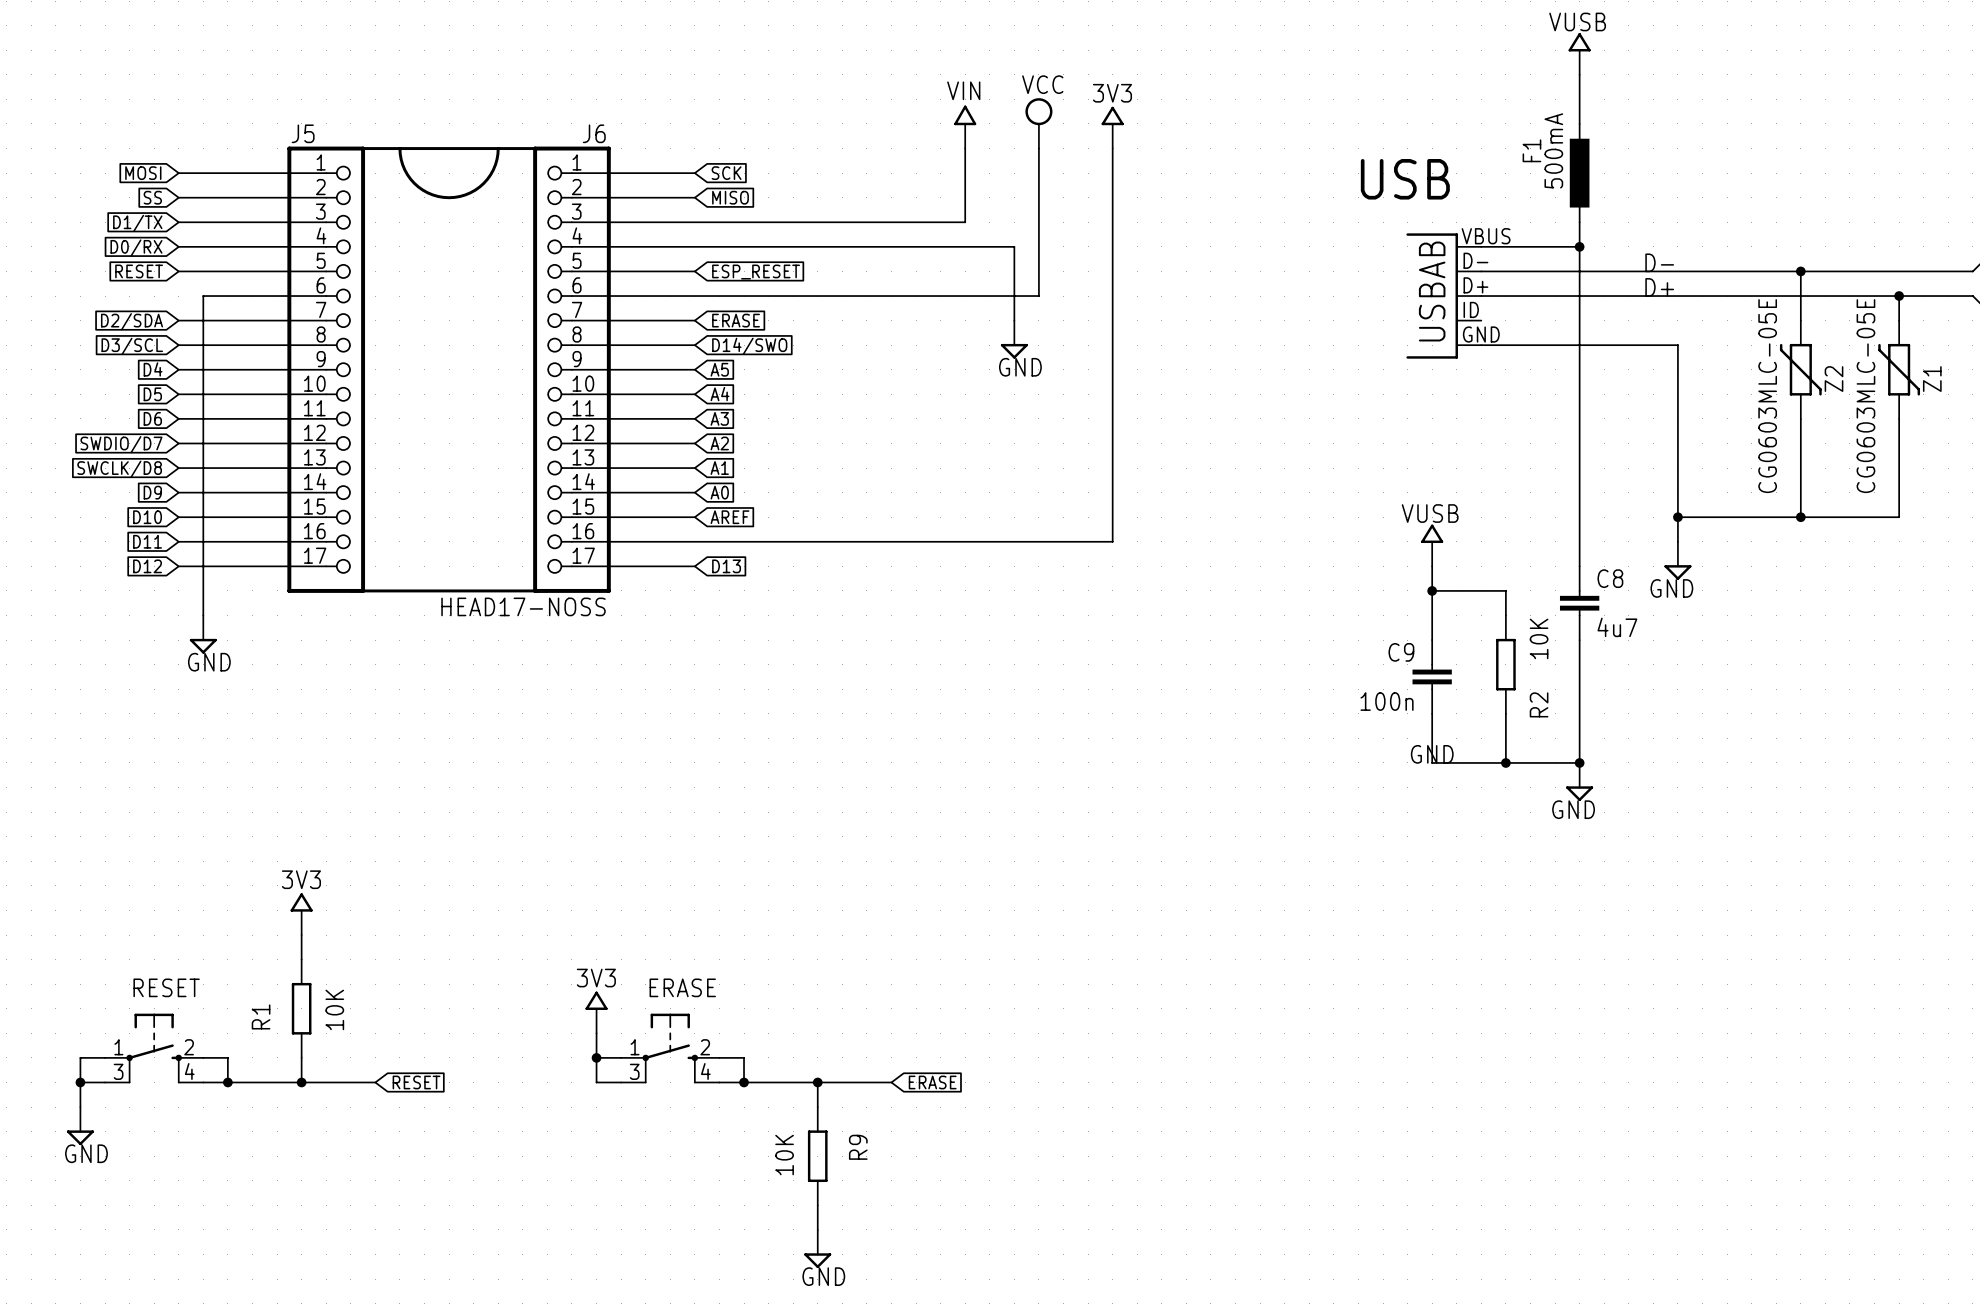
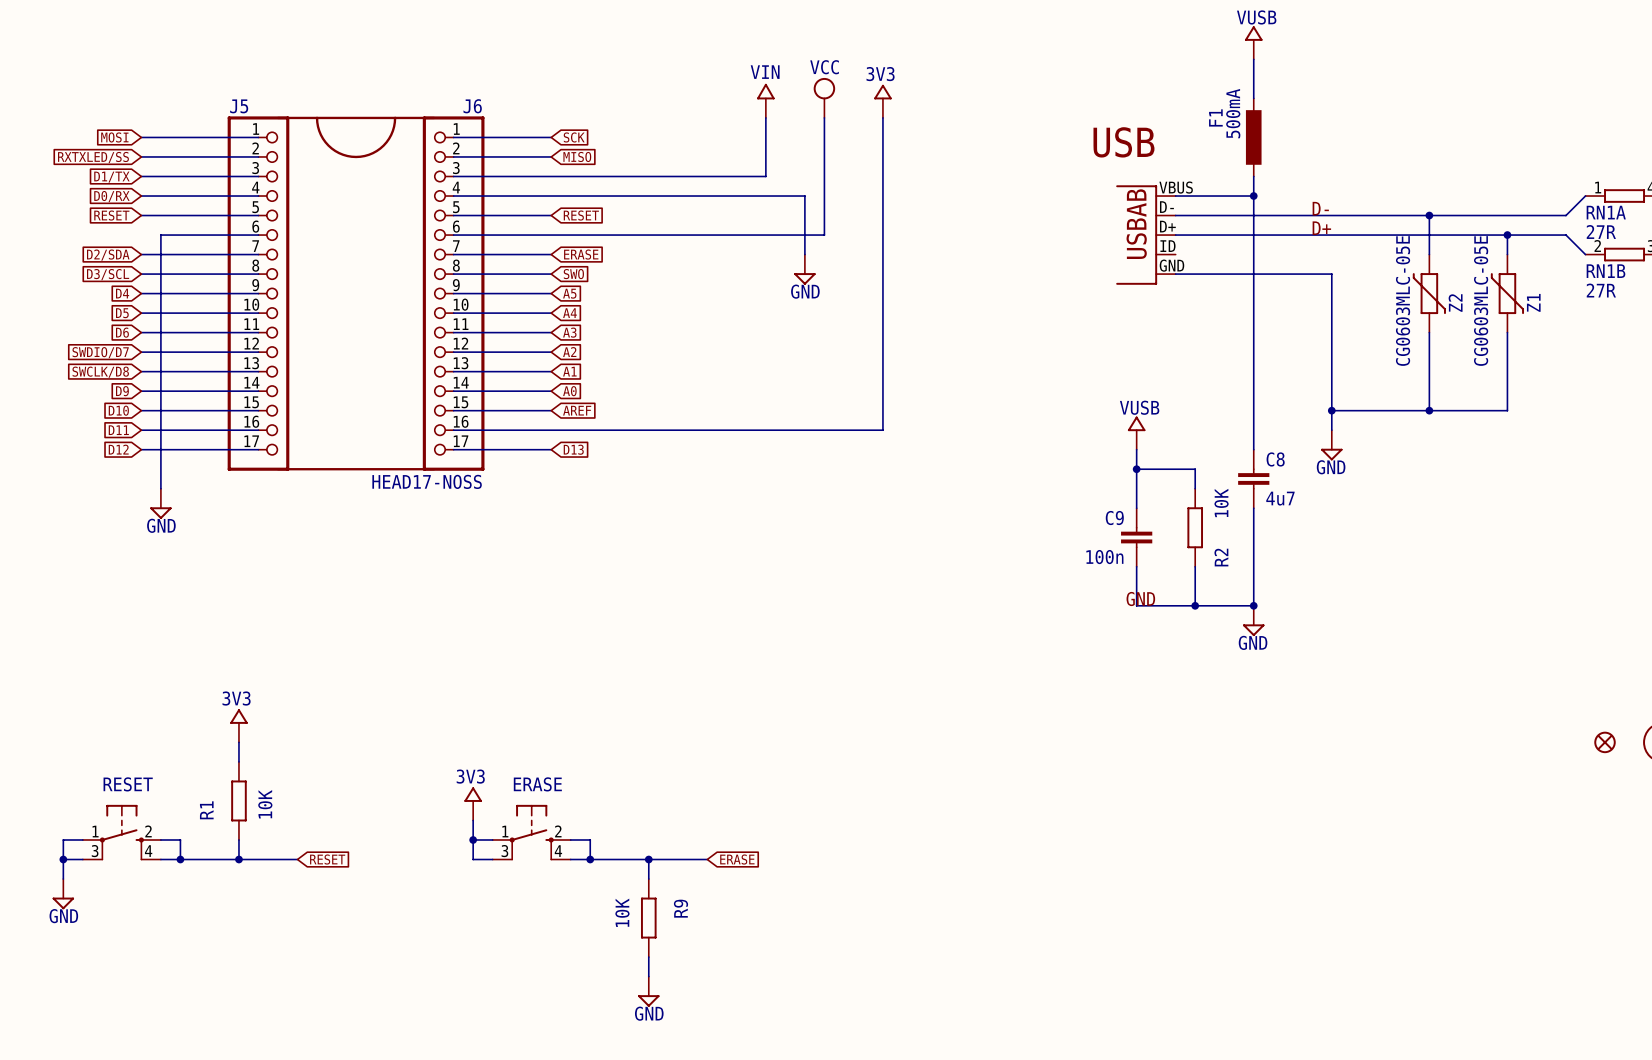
global label: SS (152, 197) -> RXTXLED/SS (93, 157)
global label: ESP_RESET (756, 272) -> RESET (581, 215)
global label: D14/SWO (749, 346) -> SWO (573, 274)

